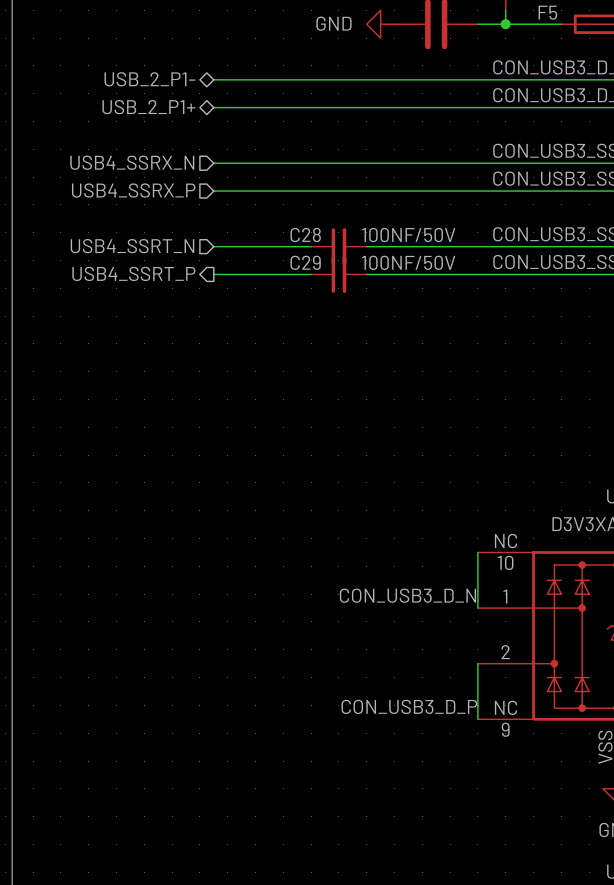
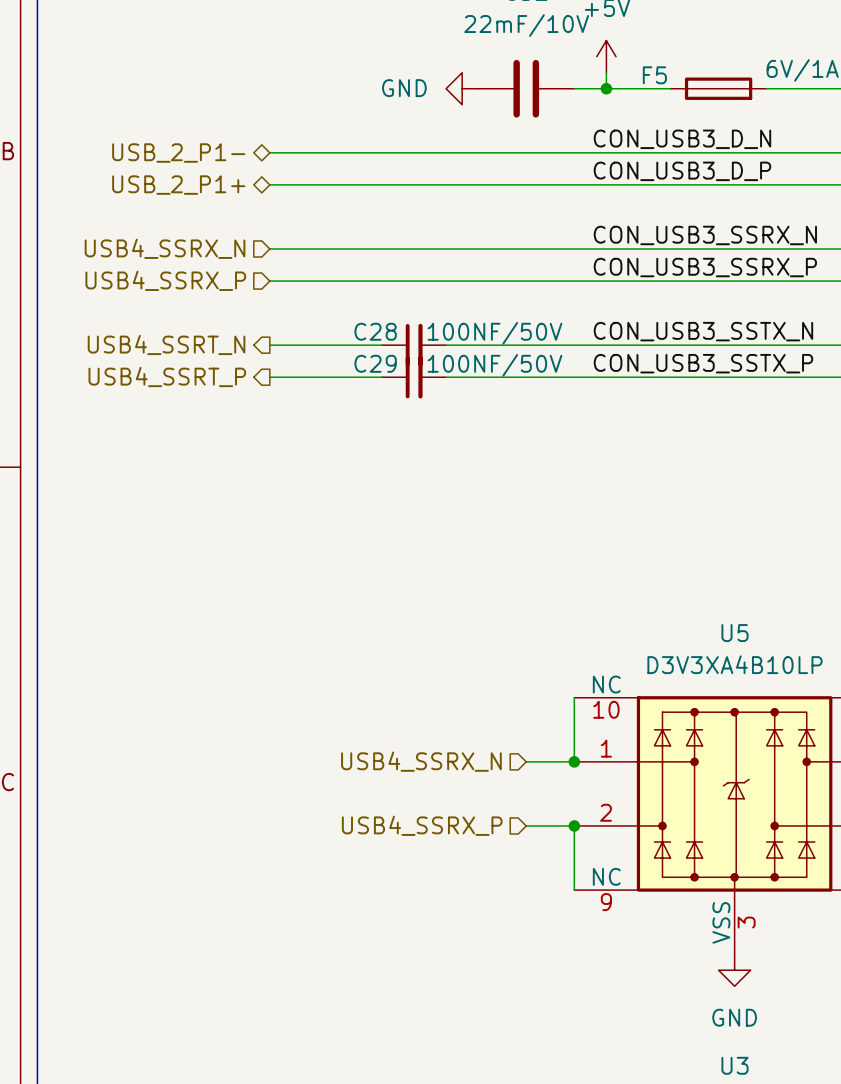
hierarchical label shape: input (132, 246) -> output (166, 344)
label: CON_USB3_D_N (407, 595) -> none
hierarchical label: none -> USB4_SSRX_N (421, 761)
wire: none -> (526, 761) (574, 761)
junction: none -> (574, 761)
hierarchical label: none -> USB4_SSRX_P (422, 825)
wire: none -> (526, 825) (574, 825)
junction: none -> (574, 825)
label: CON_USB3_D_P (409, 706) -> none

